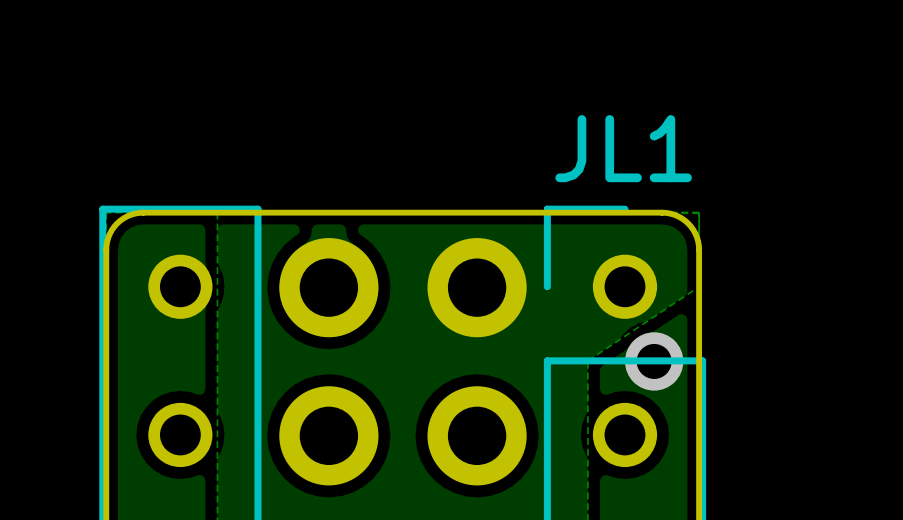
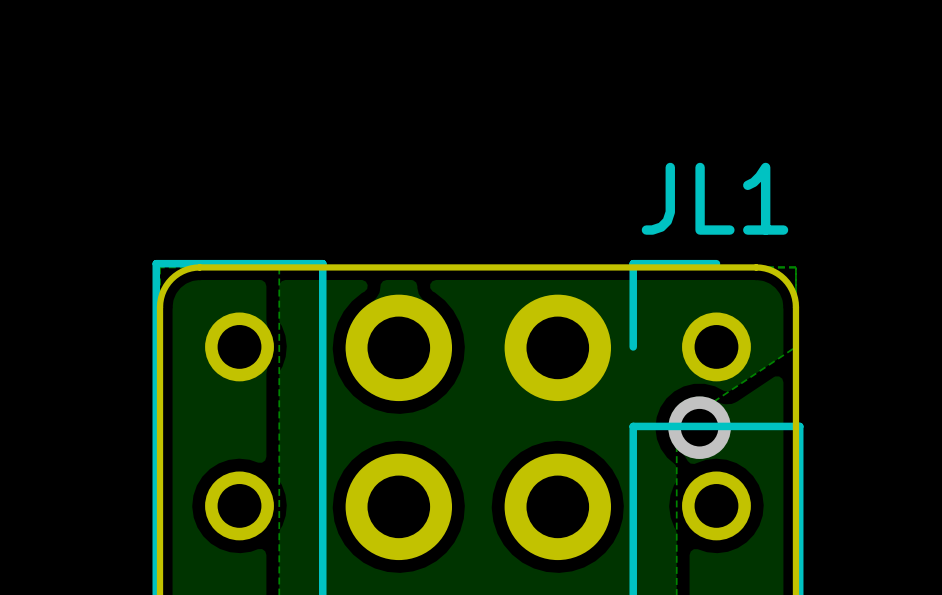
via position: (654, 361) -> (699, 427)

